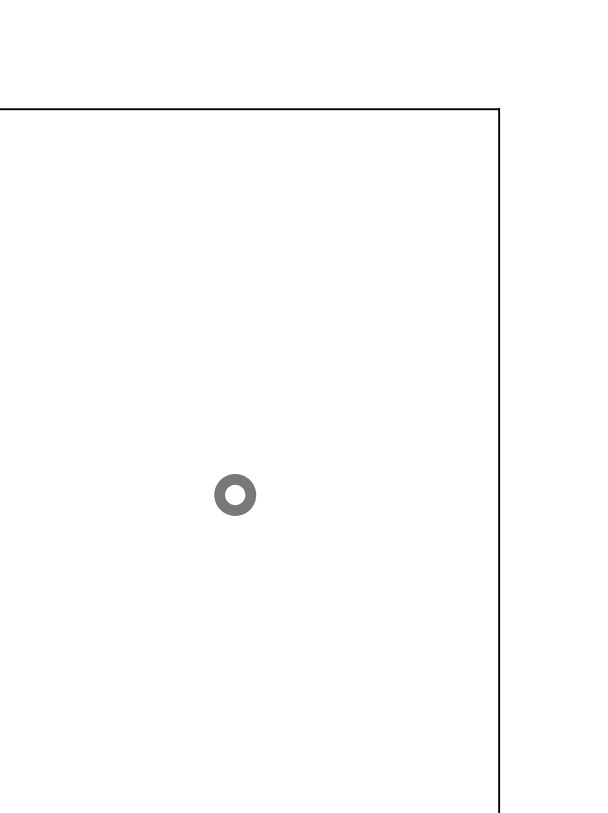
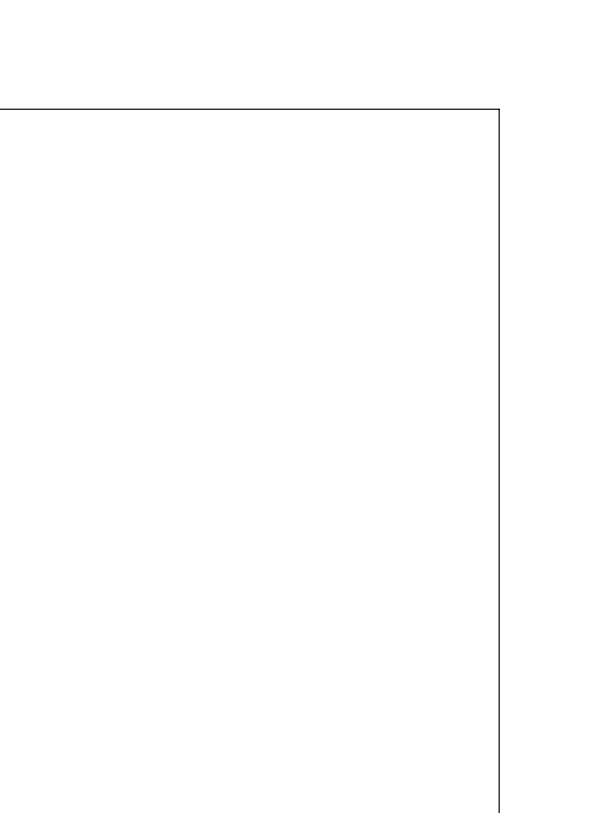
via: (235, 494) -> none

